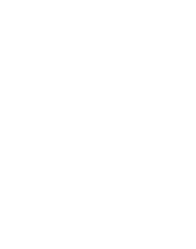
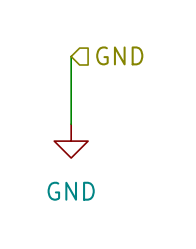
hierarchical label: none -> GND (119, 55)
wire: none -> (71, 56) (71, 124)
power symbol: none -> GND (71, 141)

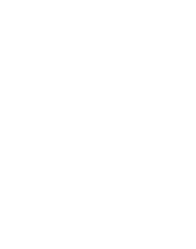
hierarchical label: GND (119, 55) -> none
wire: (71, 56) (71, 124) -> none
power symbol: GND (71, 141) -> none

